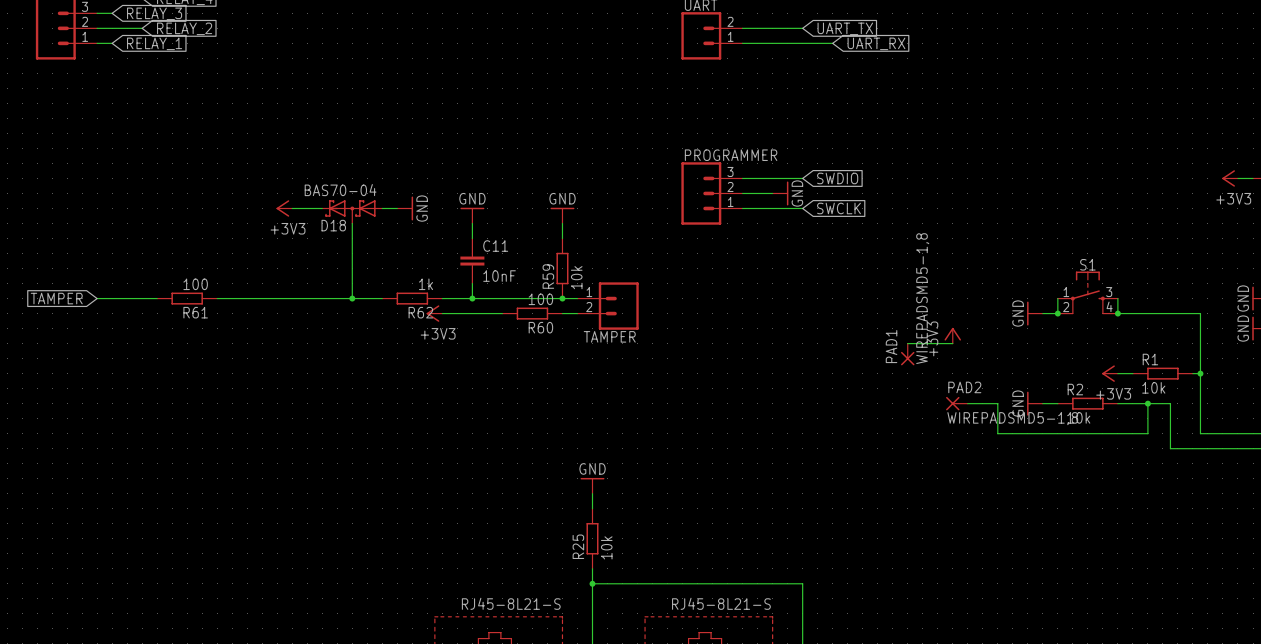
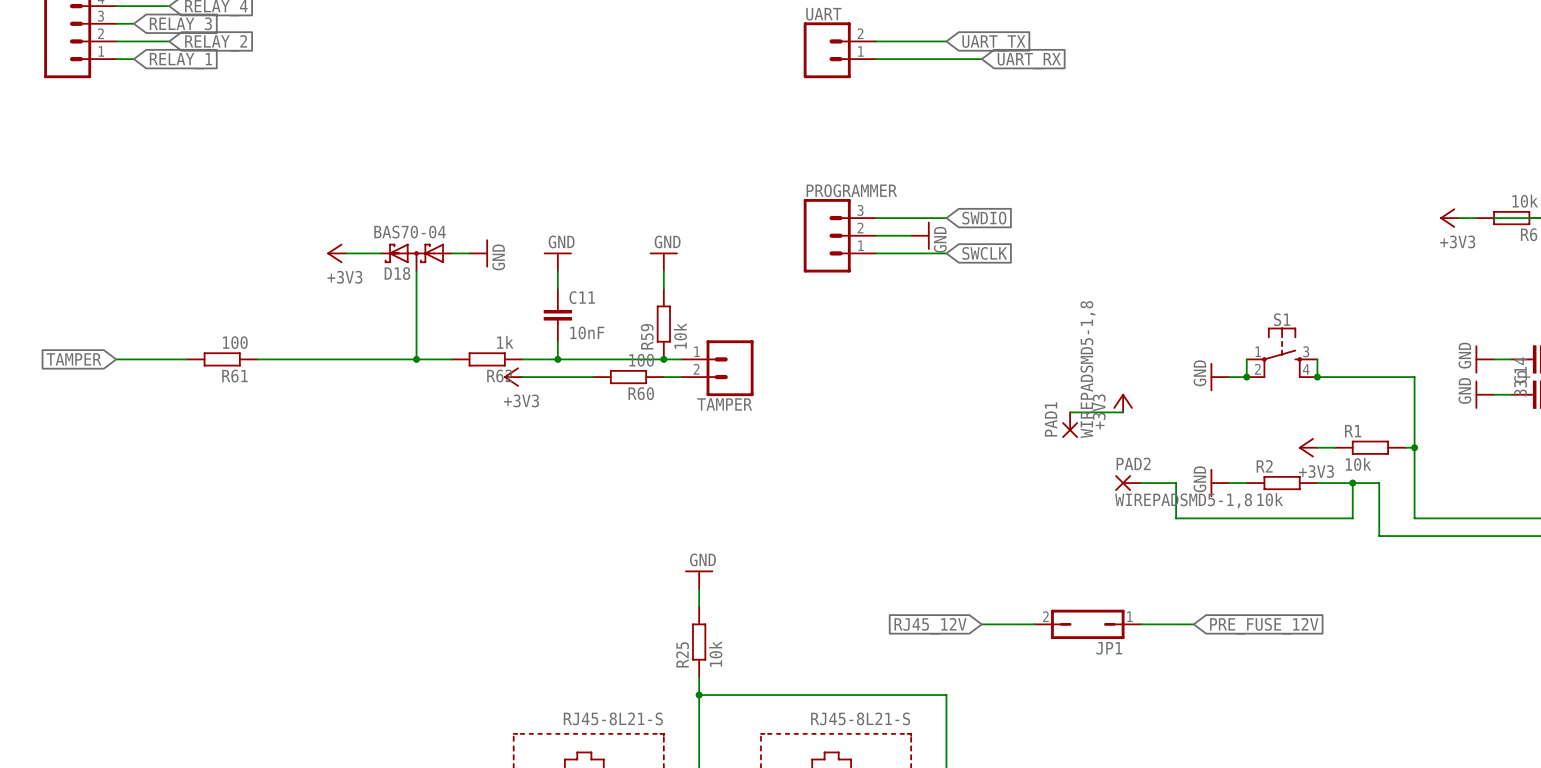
global label: none -> RJ45_12V (930, 626)
wire: none -> (981, 624) (1034, 624)
JP1: none -> (1087, 624)
wire: none -> (1140, 624) (1193, 624)
global label: none -> PRE_FUSE_12V (1264, 626)

